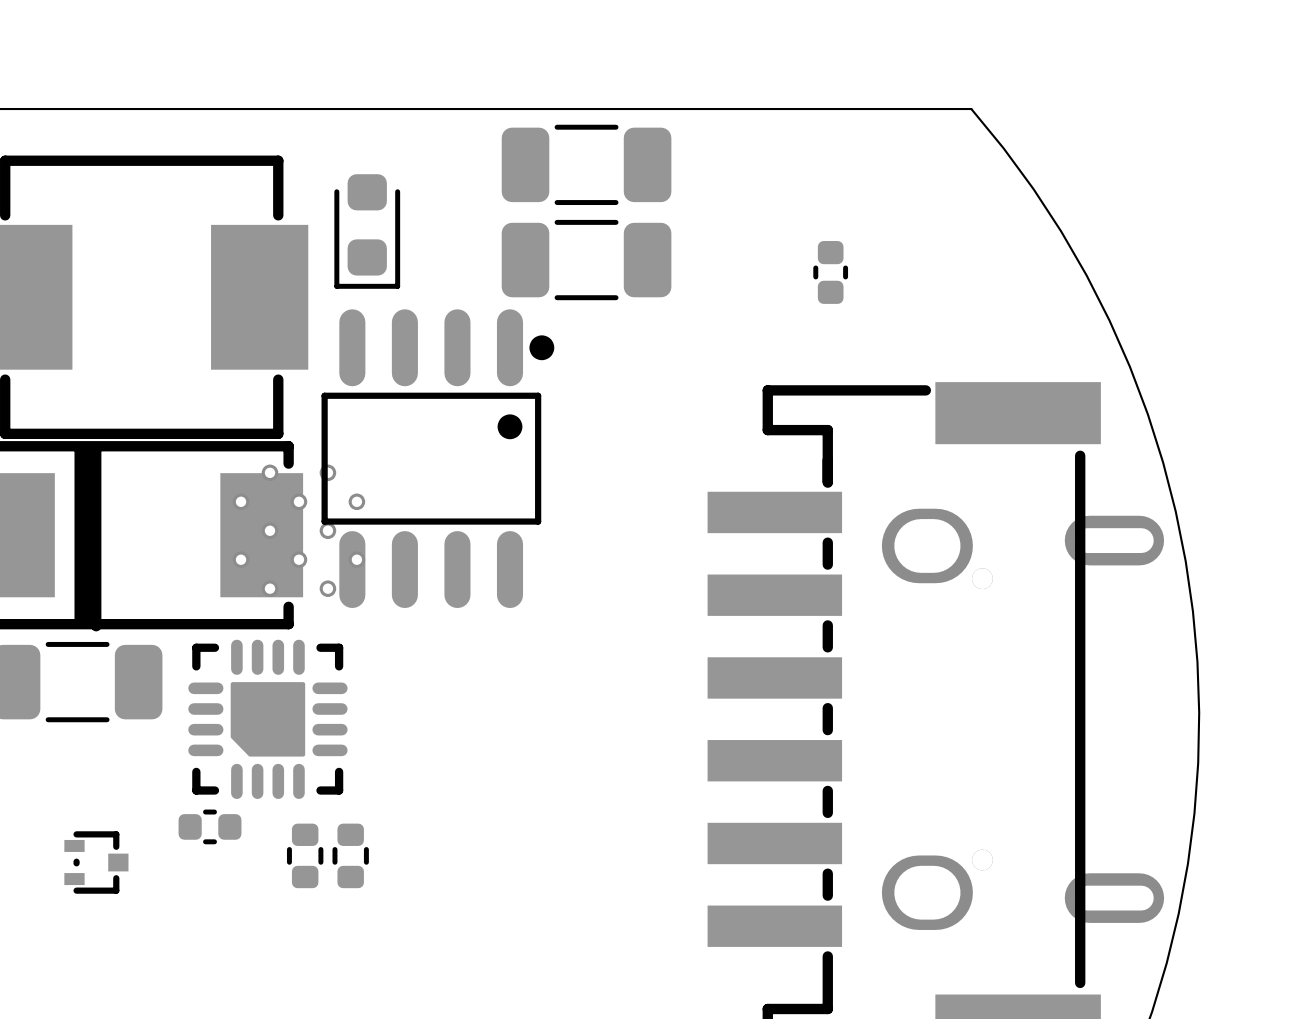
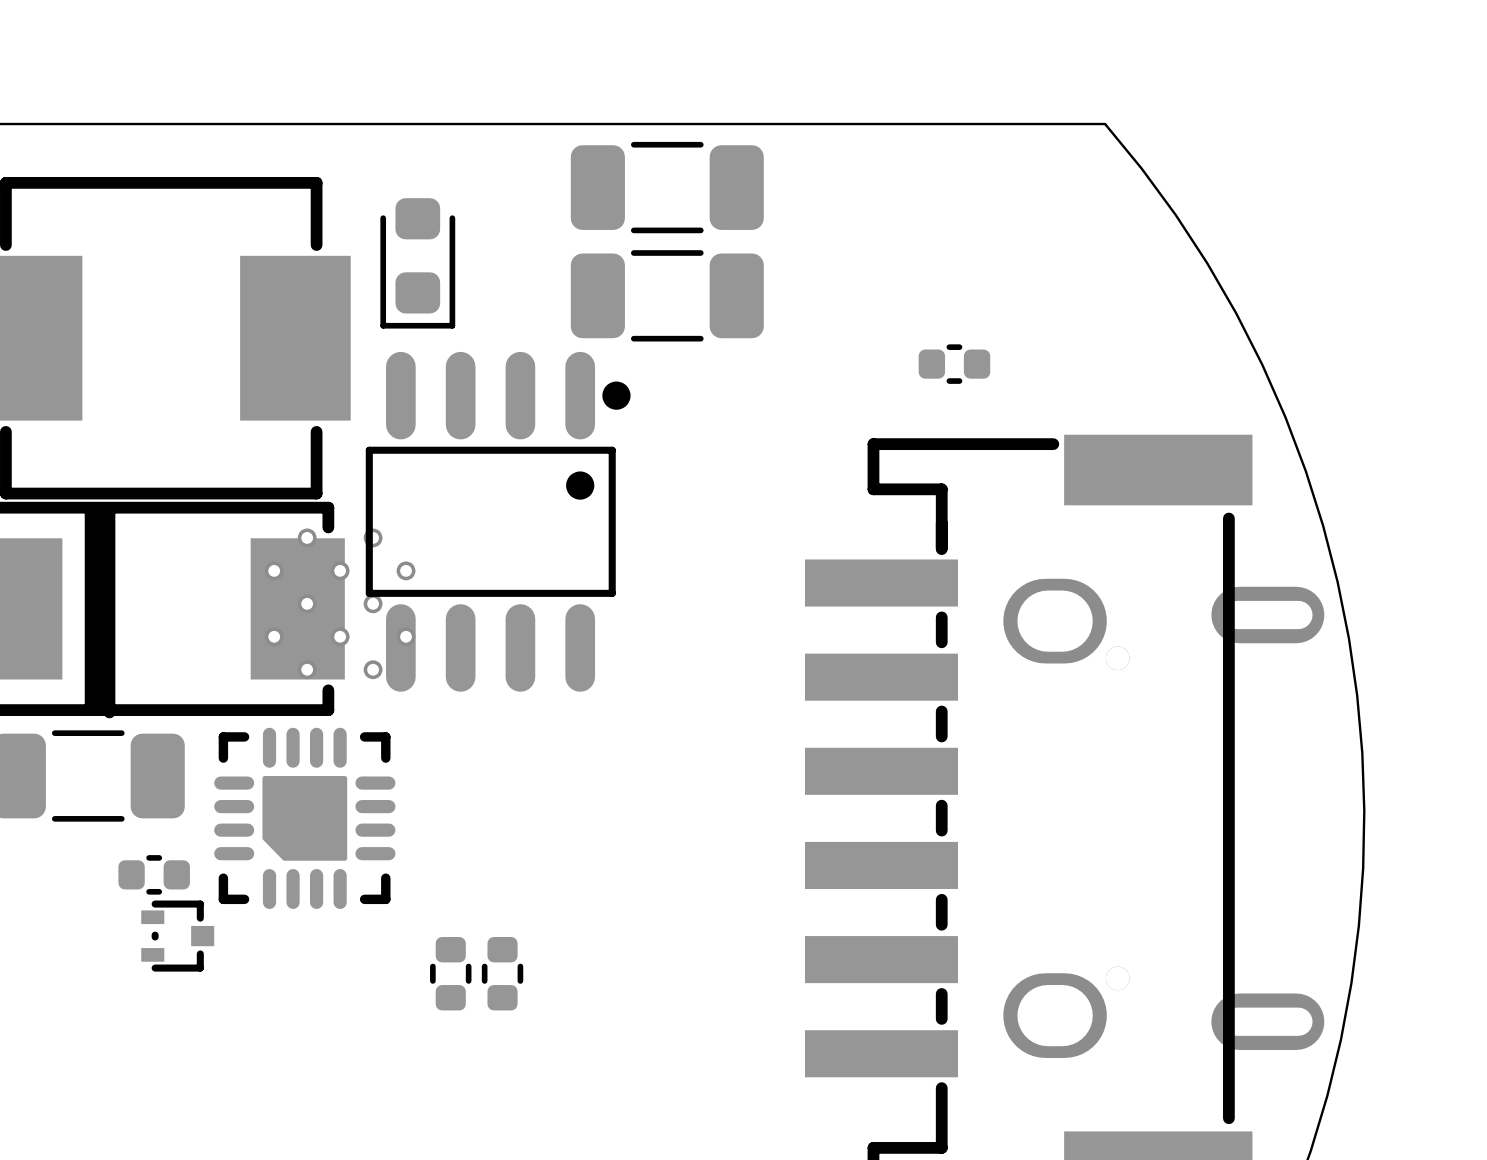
part rotation: 0° (830, 272) -> 90° clockwise (954, 364)
part position: (830, 272) -> (954, 364)
part position: (210, 826) -> (154, 874)
part: (305, 855) -> none
part: (350, 855) -> none
part: none -> (450, 973)
part: none -> (502, 973)
part position: (96, 862) -> (177, 936)

